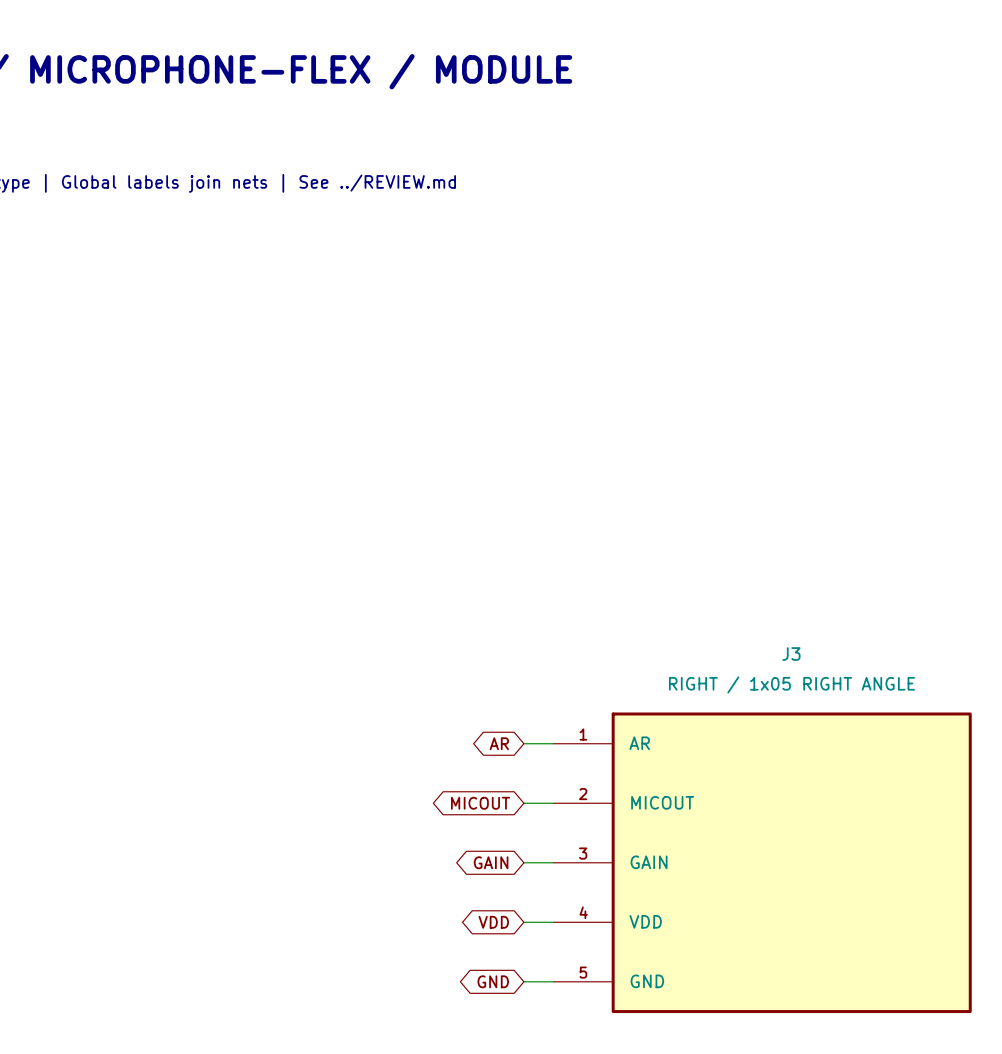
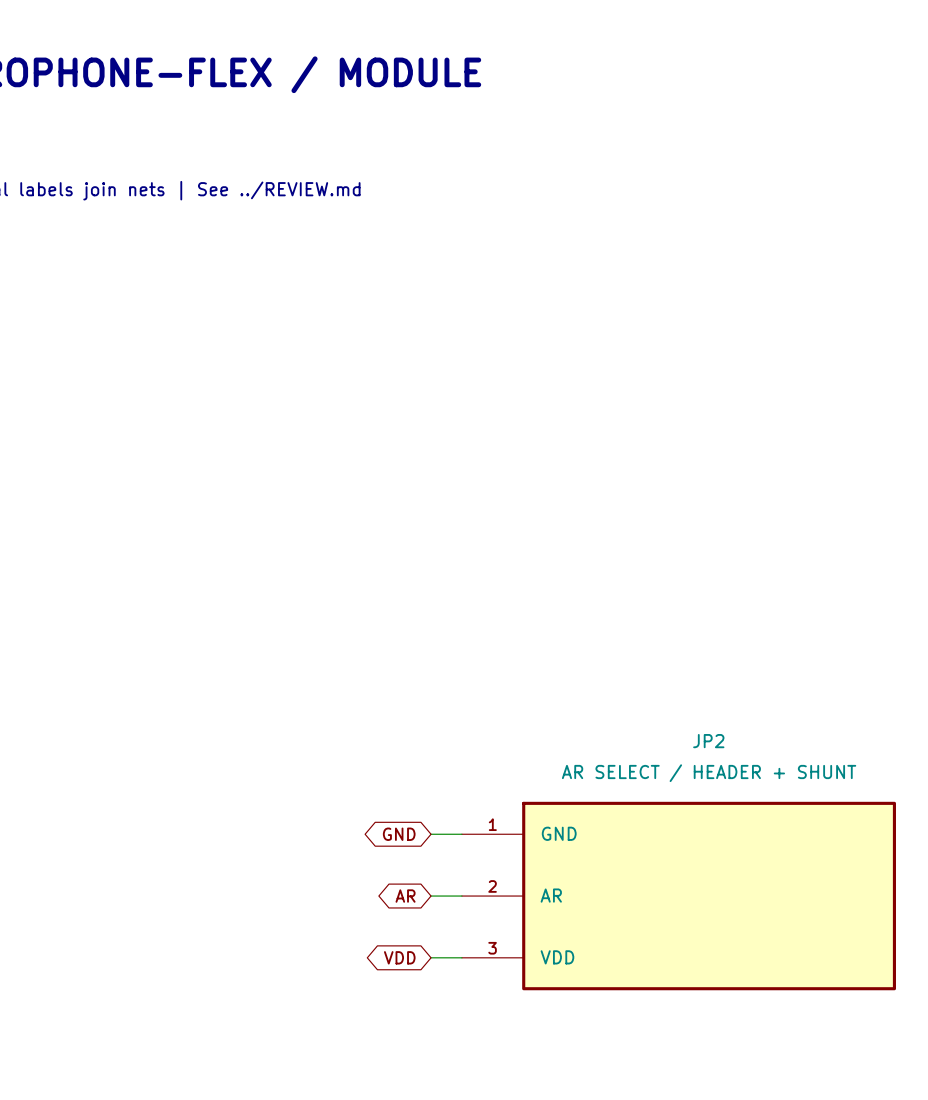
global label: AR (499, 743) -> none
wire: (523, 743) (553, 743) -> none
global label: MICOUT (480, 803) -> GND (399, 834)
global label: GAIN (491, 862) -> AR (405, 896)
J3: RIGHT / 1x05 RIGHT ANGLE (762, 862) -> none
JP2: none -> AR SELECT / HEADER + SHUNT (678, 896)
global label: GND (493, 981) -> none
wire: (523, 981) (553, 981) -> none

